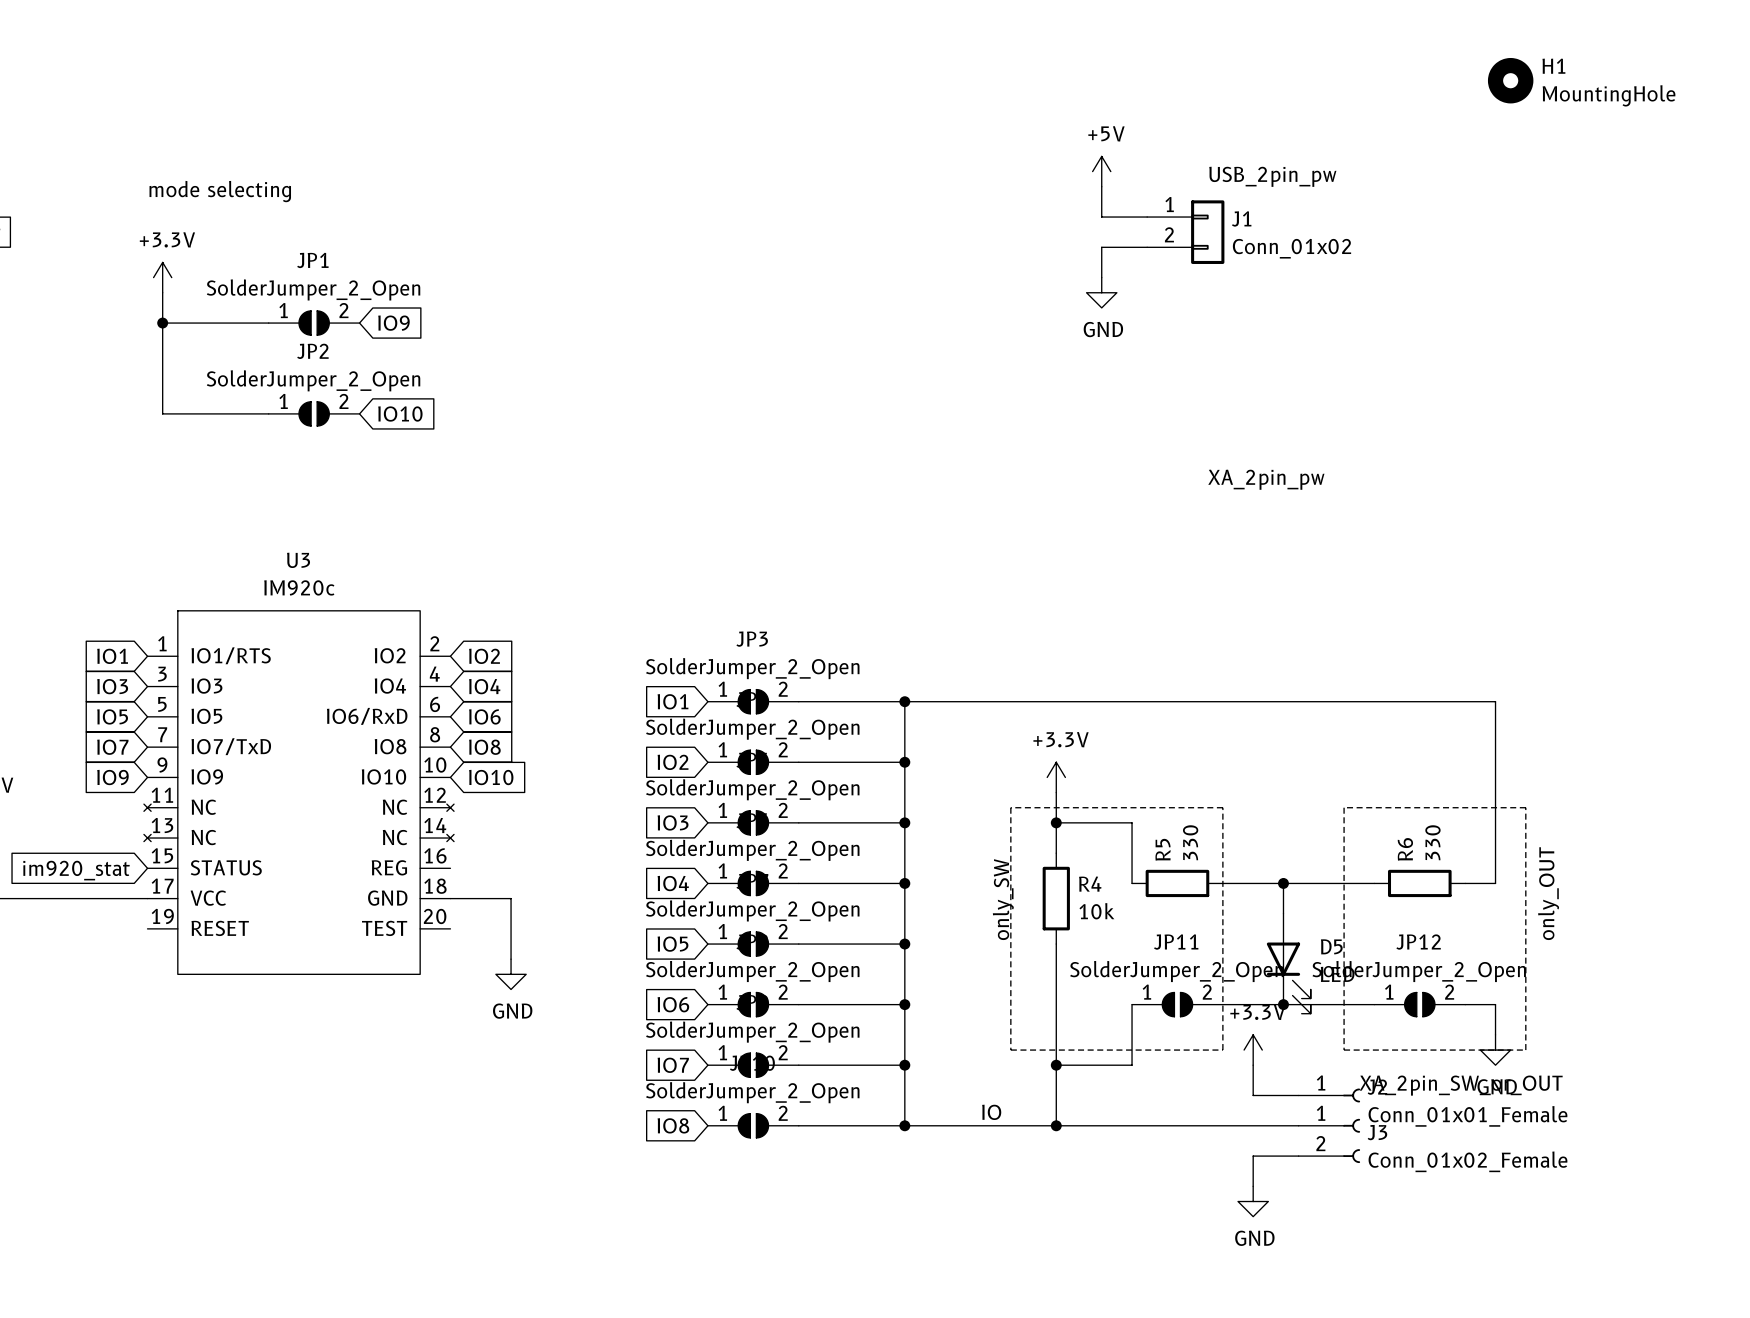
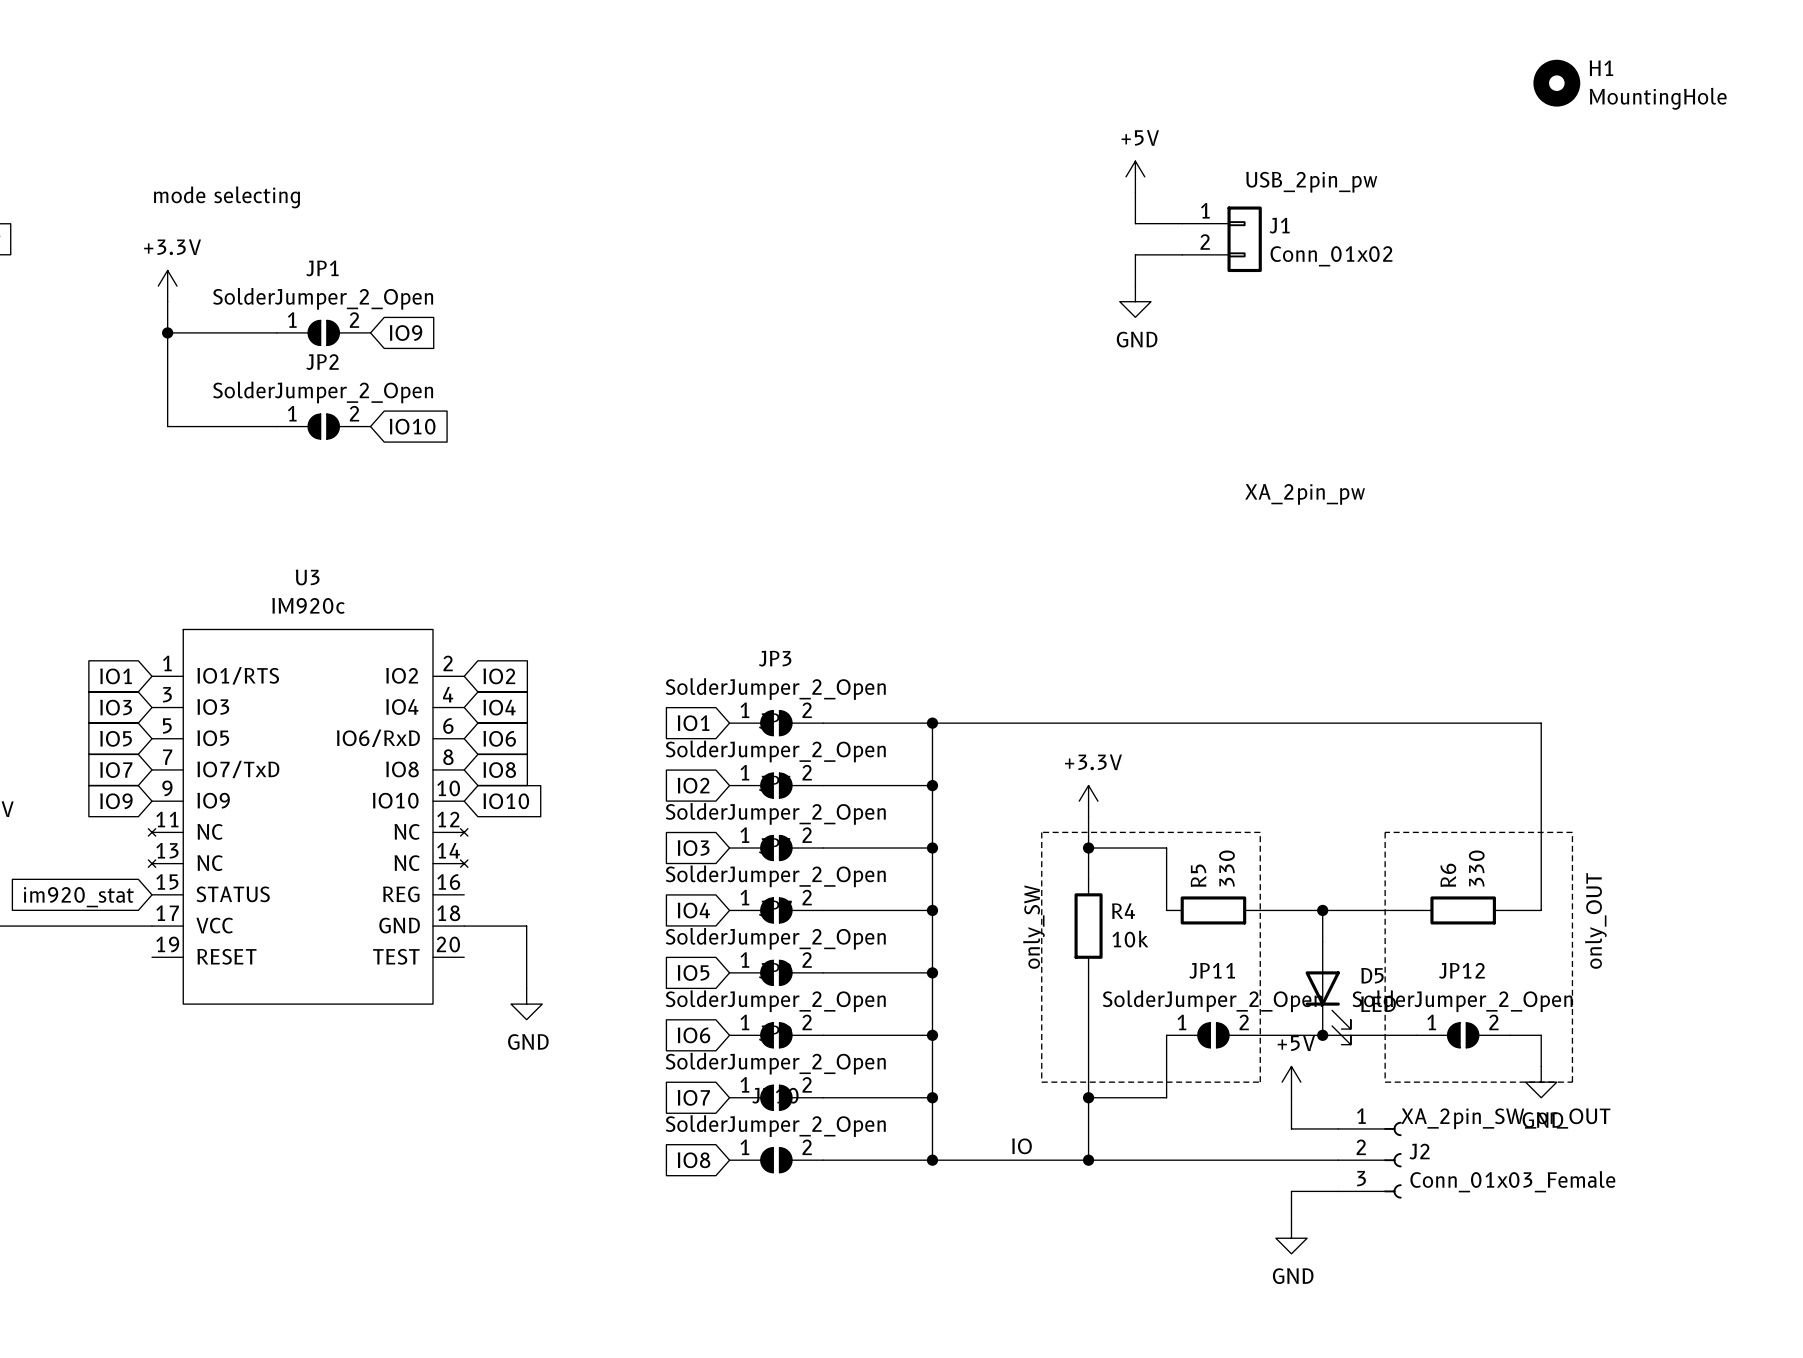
power symbol: +3.3V (1253, 1050) -> +5V (1291, 1082)
J2 symbol: [1298, 1088, 1361, 1103] -> [1338, 1121, 1402, 1199]
J2 value: Conn_01x01_Female (1467, 1116) -> Conn_01x03_Female (1512, 1181)
J3: Conn_01x02_Female (1329, 1140) -> none

